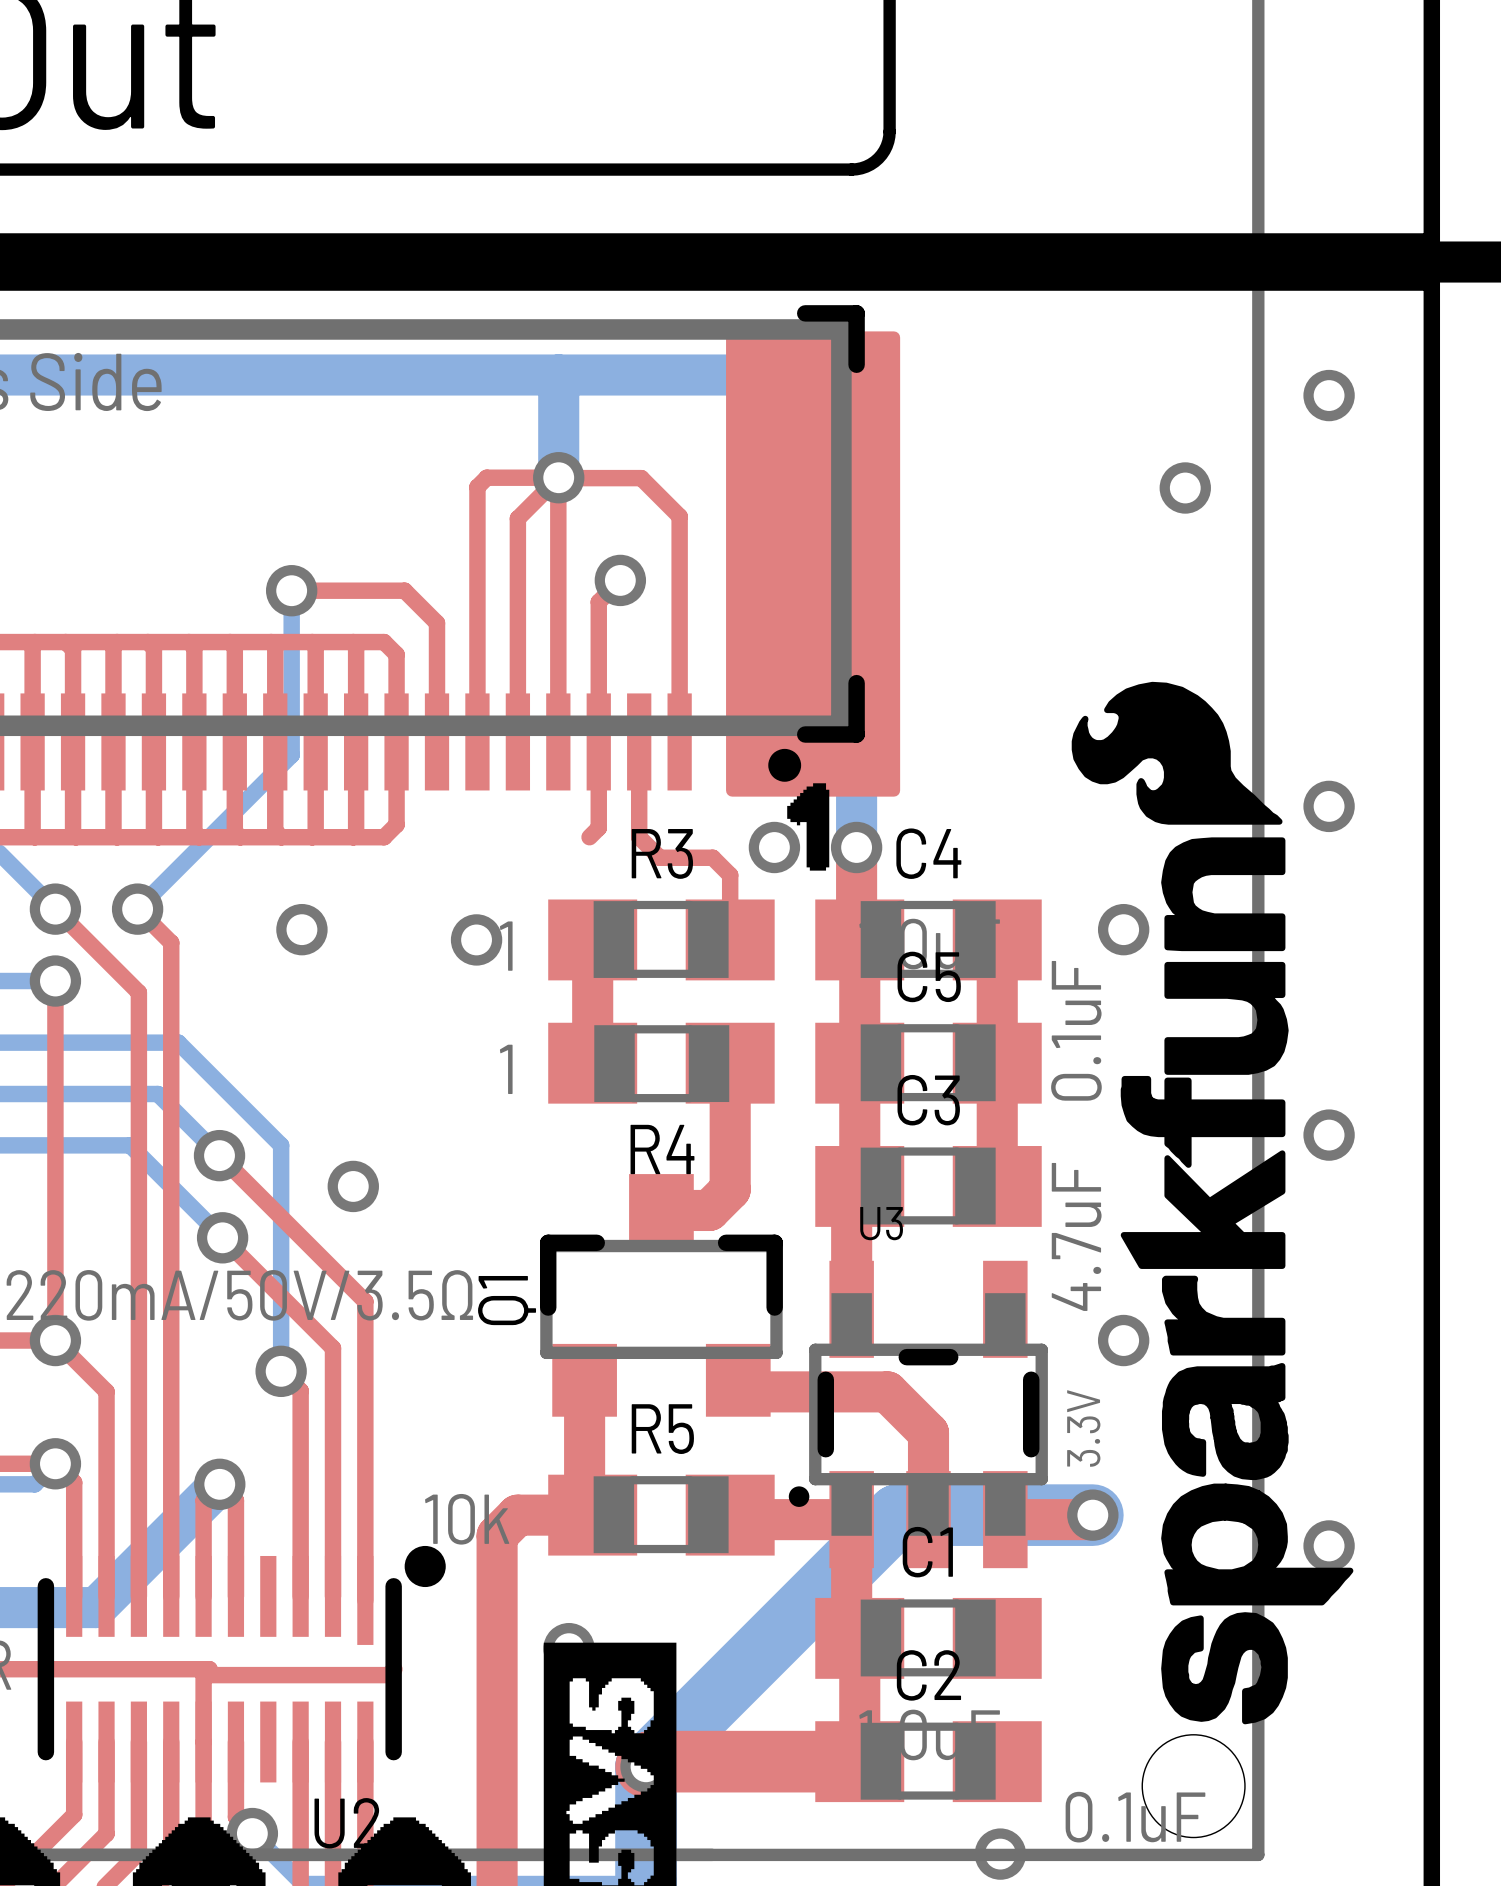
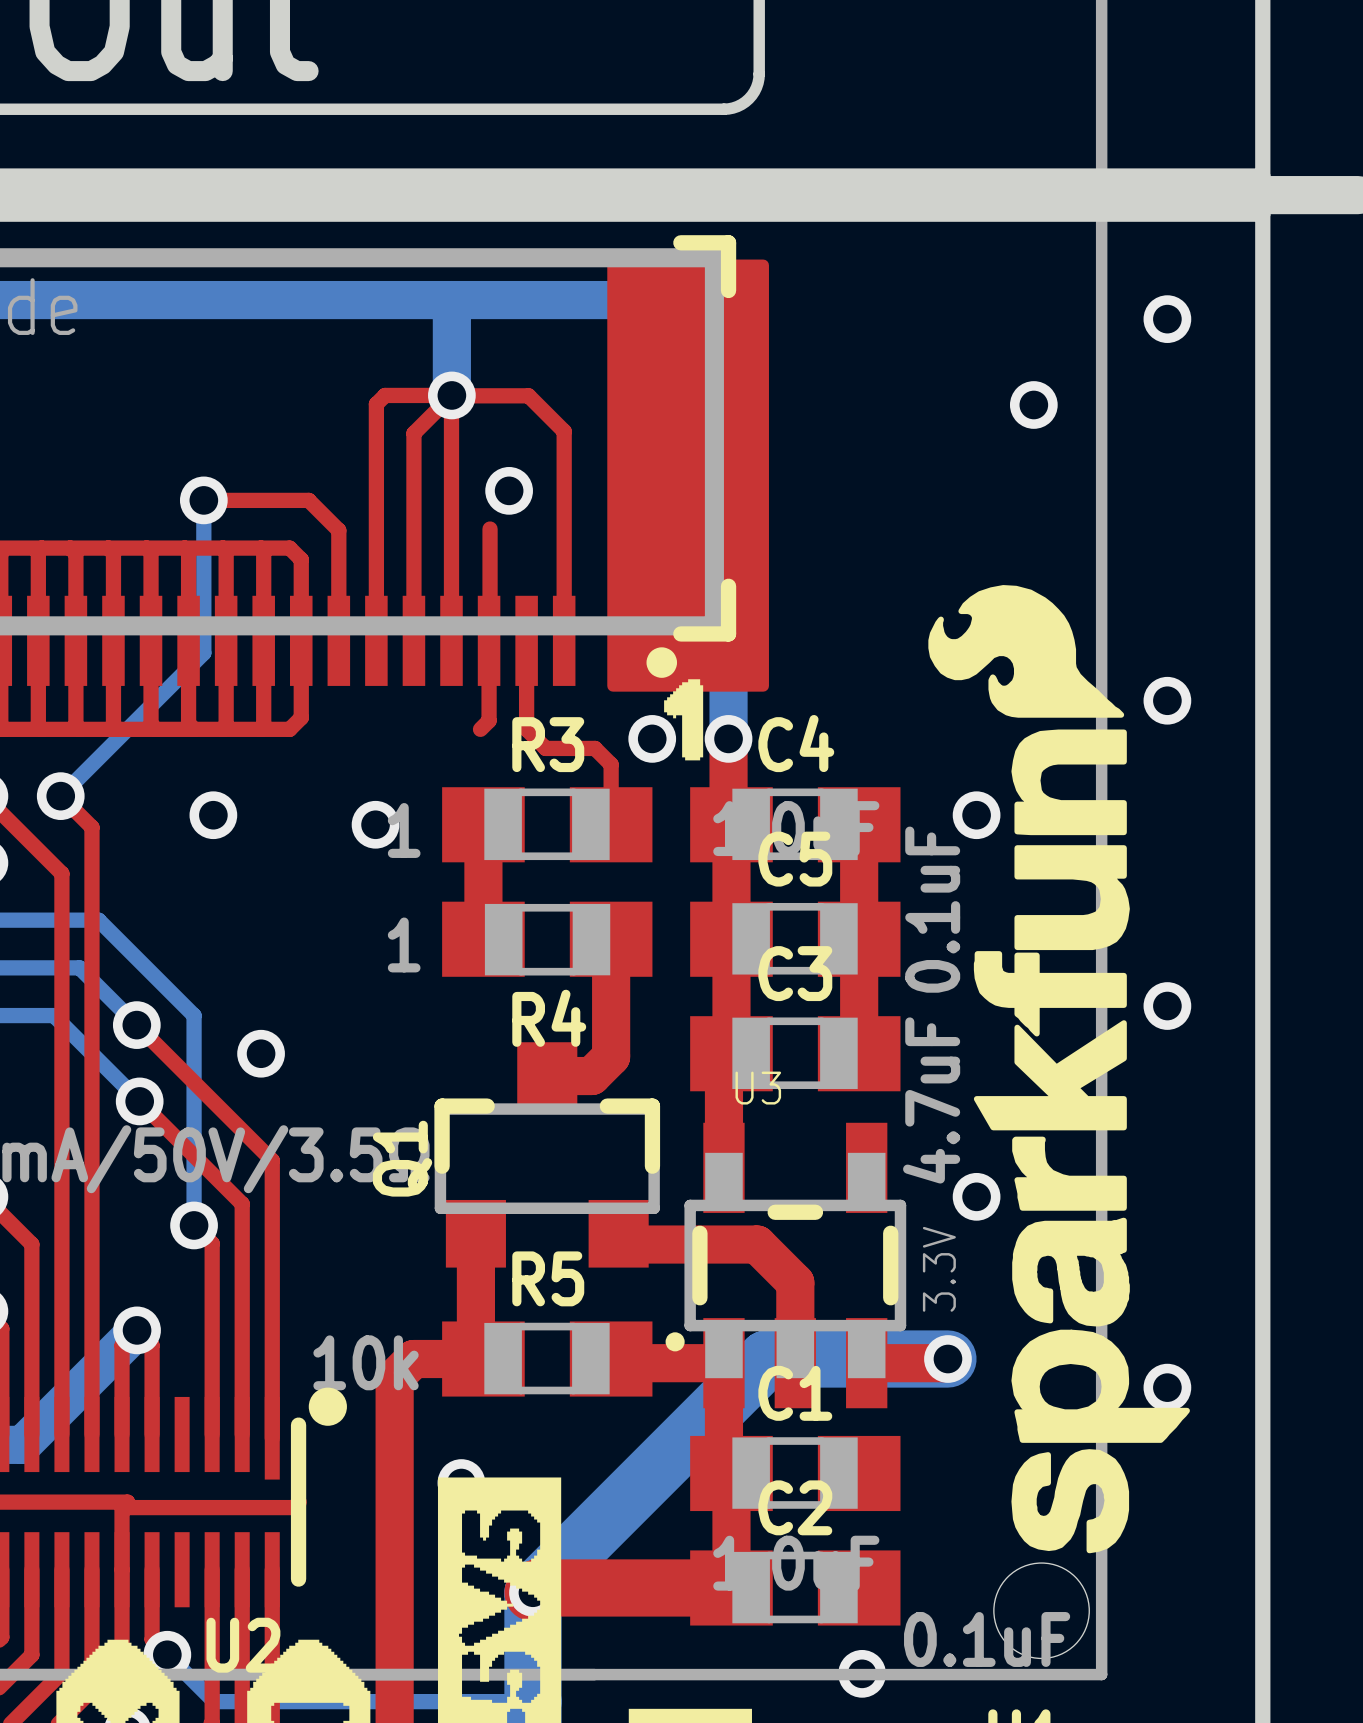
top track: (620, 580) (598, 602) (598, 741) -> (490, 529) (490, 639)

